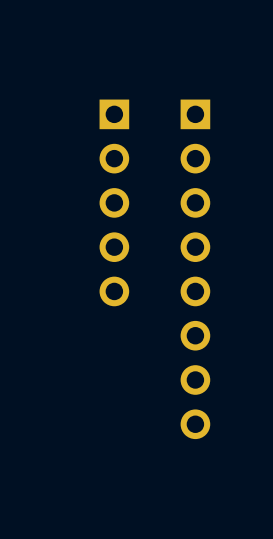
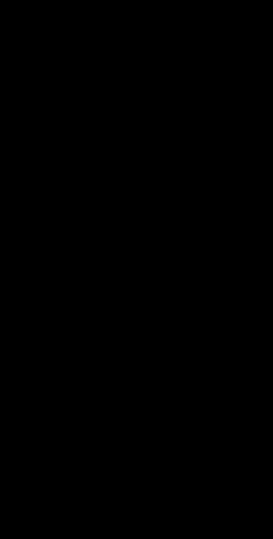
part: (114, 202) -> none
part: (195, 269) -> none

